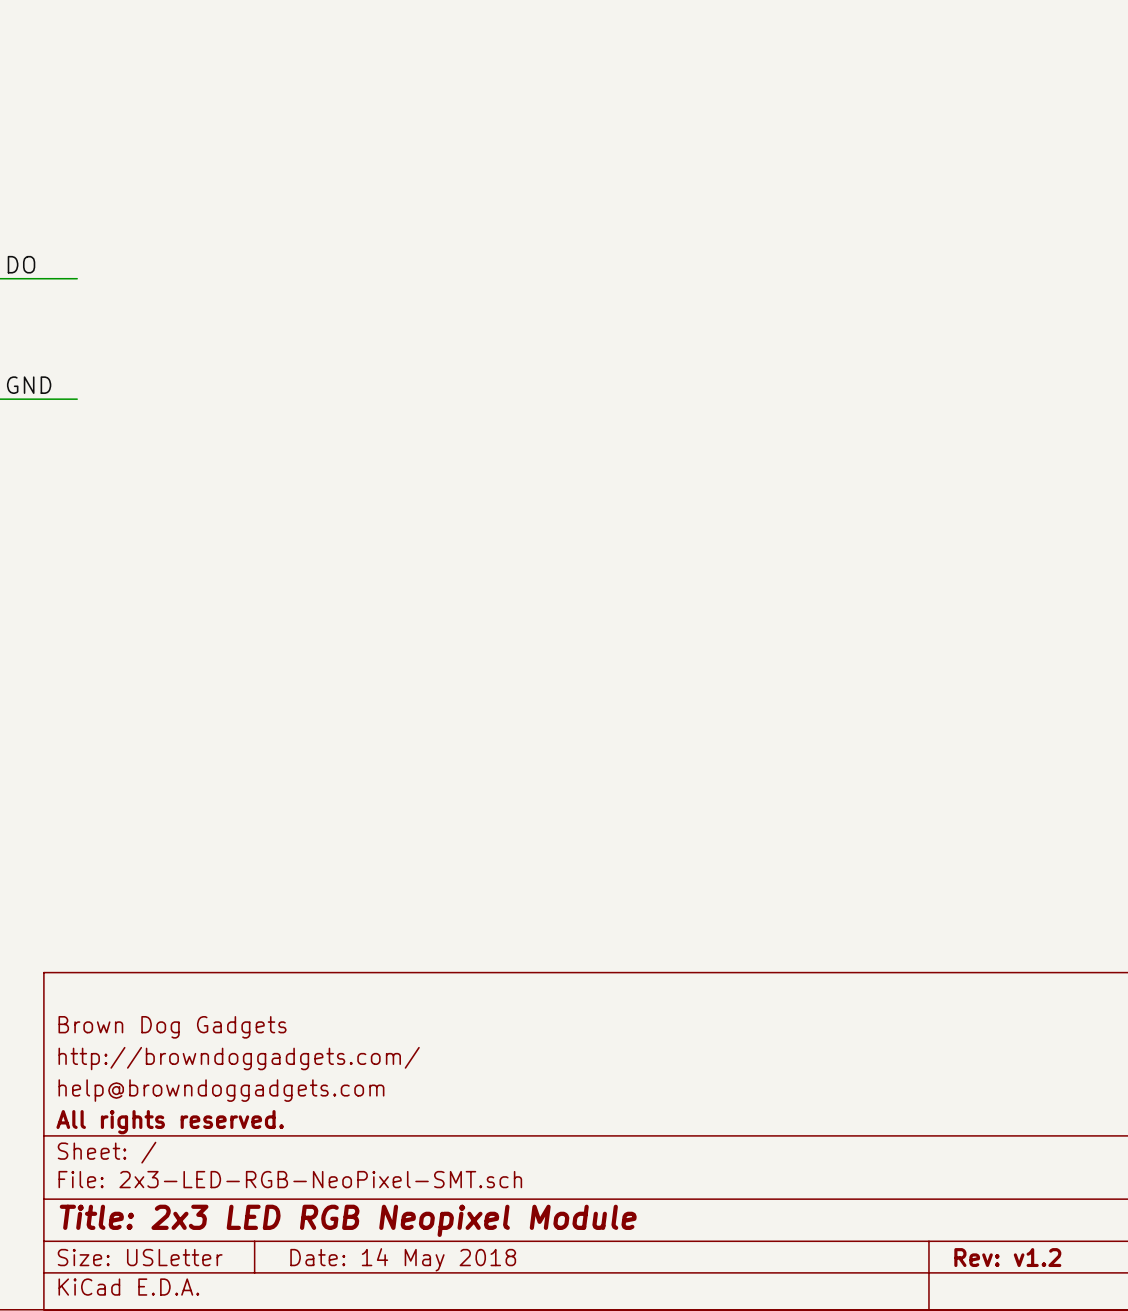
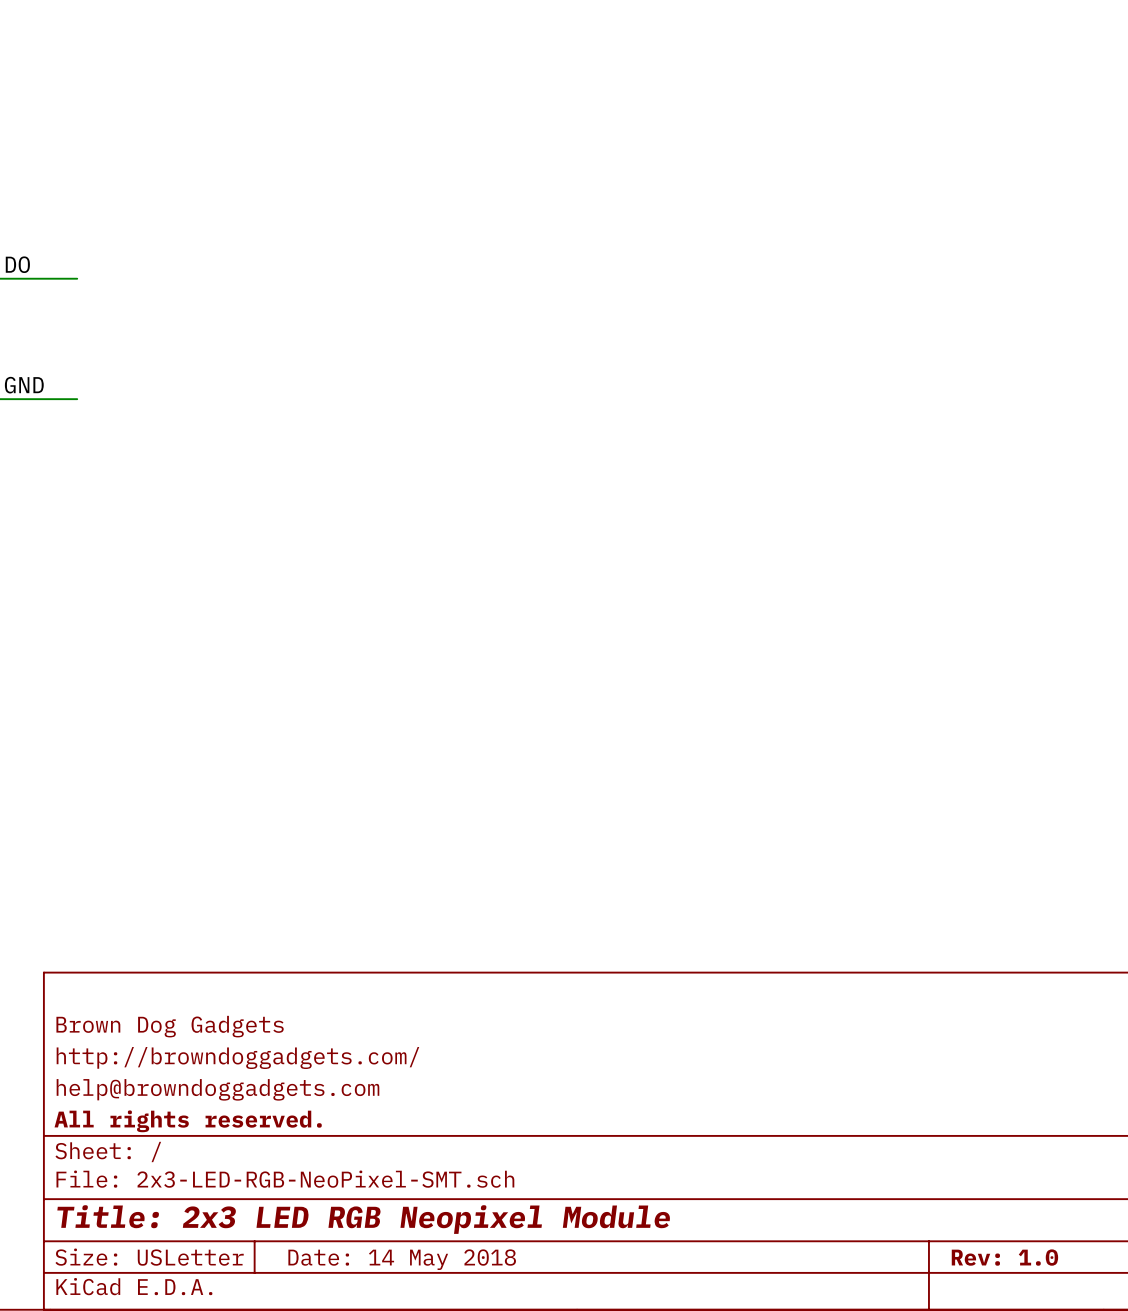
title block: Rev: v1.2 (1007, 1257) -> Rev: 1.0 (1004, 1257)

